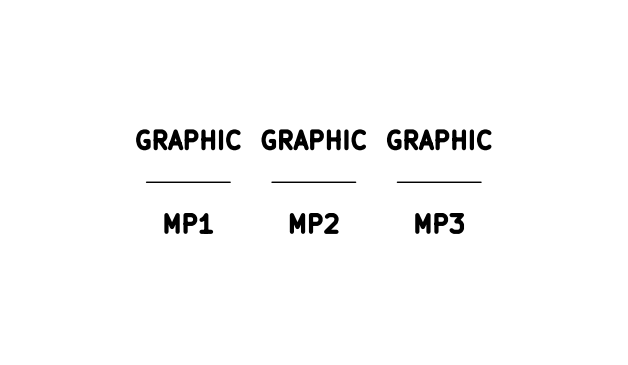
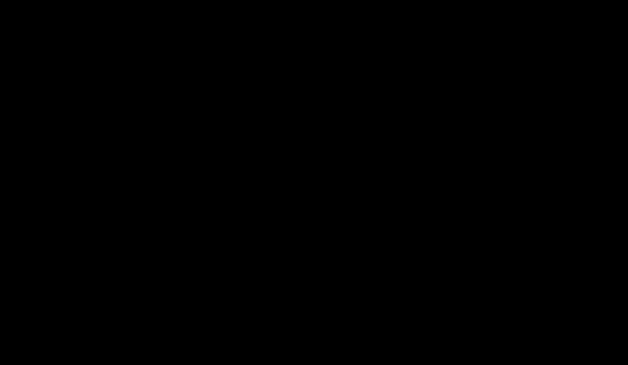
MP1: GRAPHIC (188, 182) -> none
MP2: GRAPHIC (313, 182) -> none
MP3: GRAPHIC (439, 182) -> none

